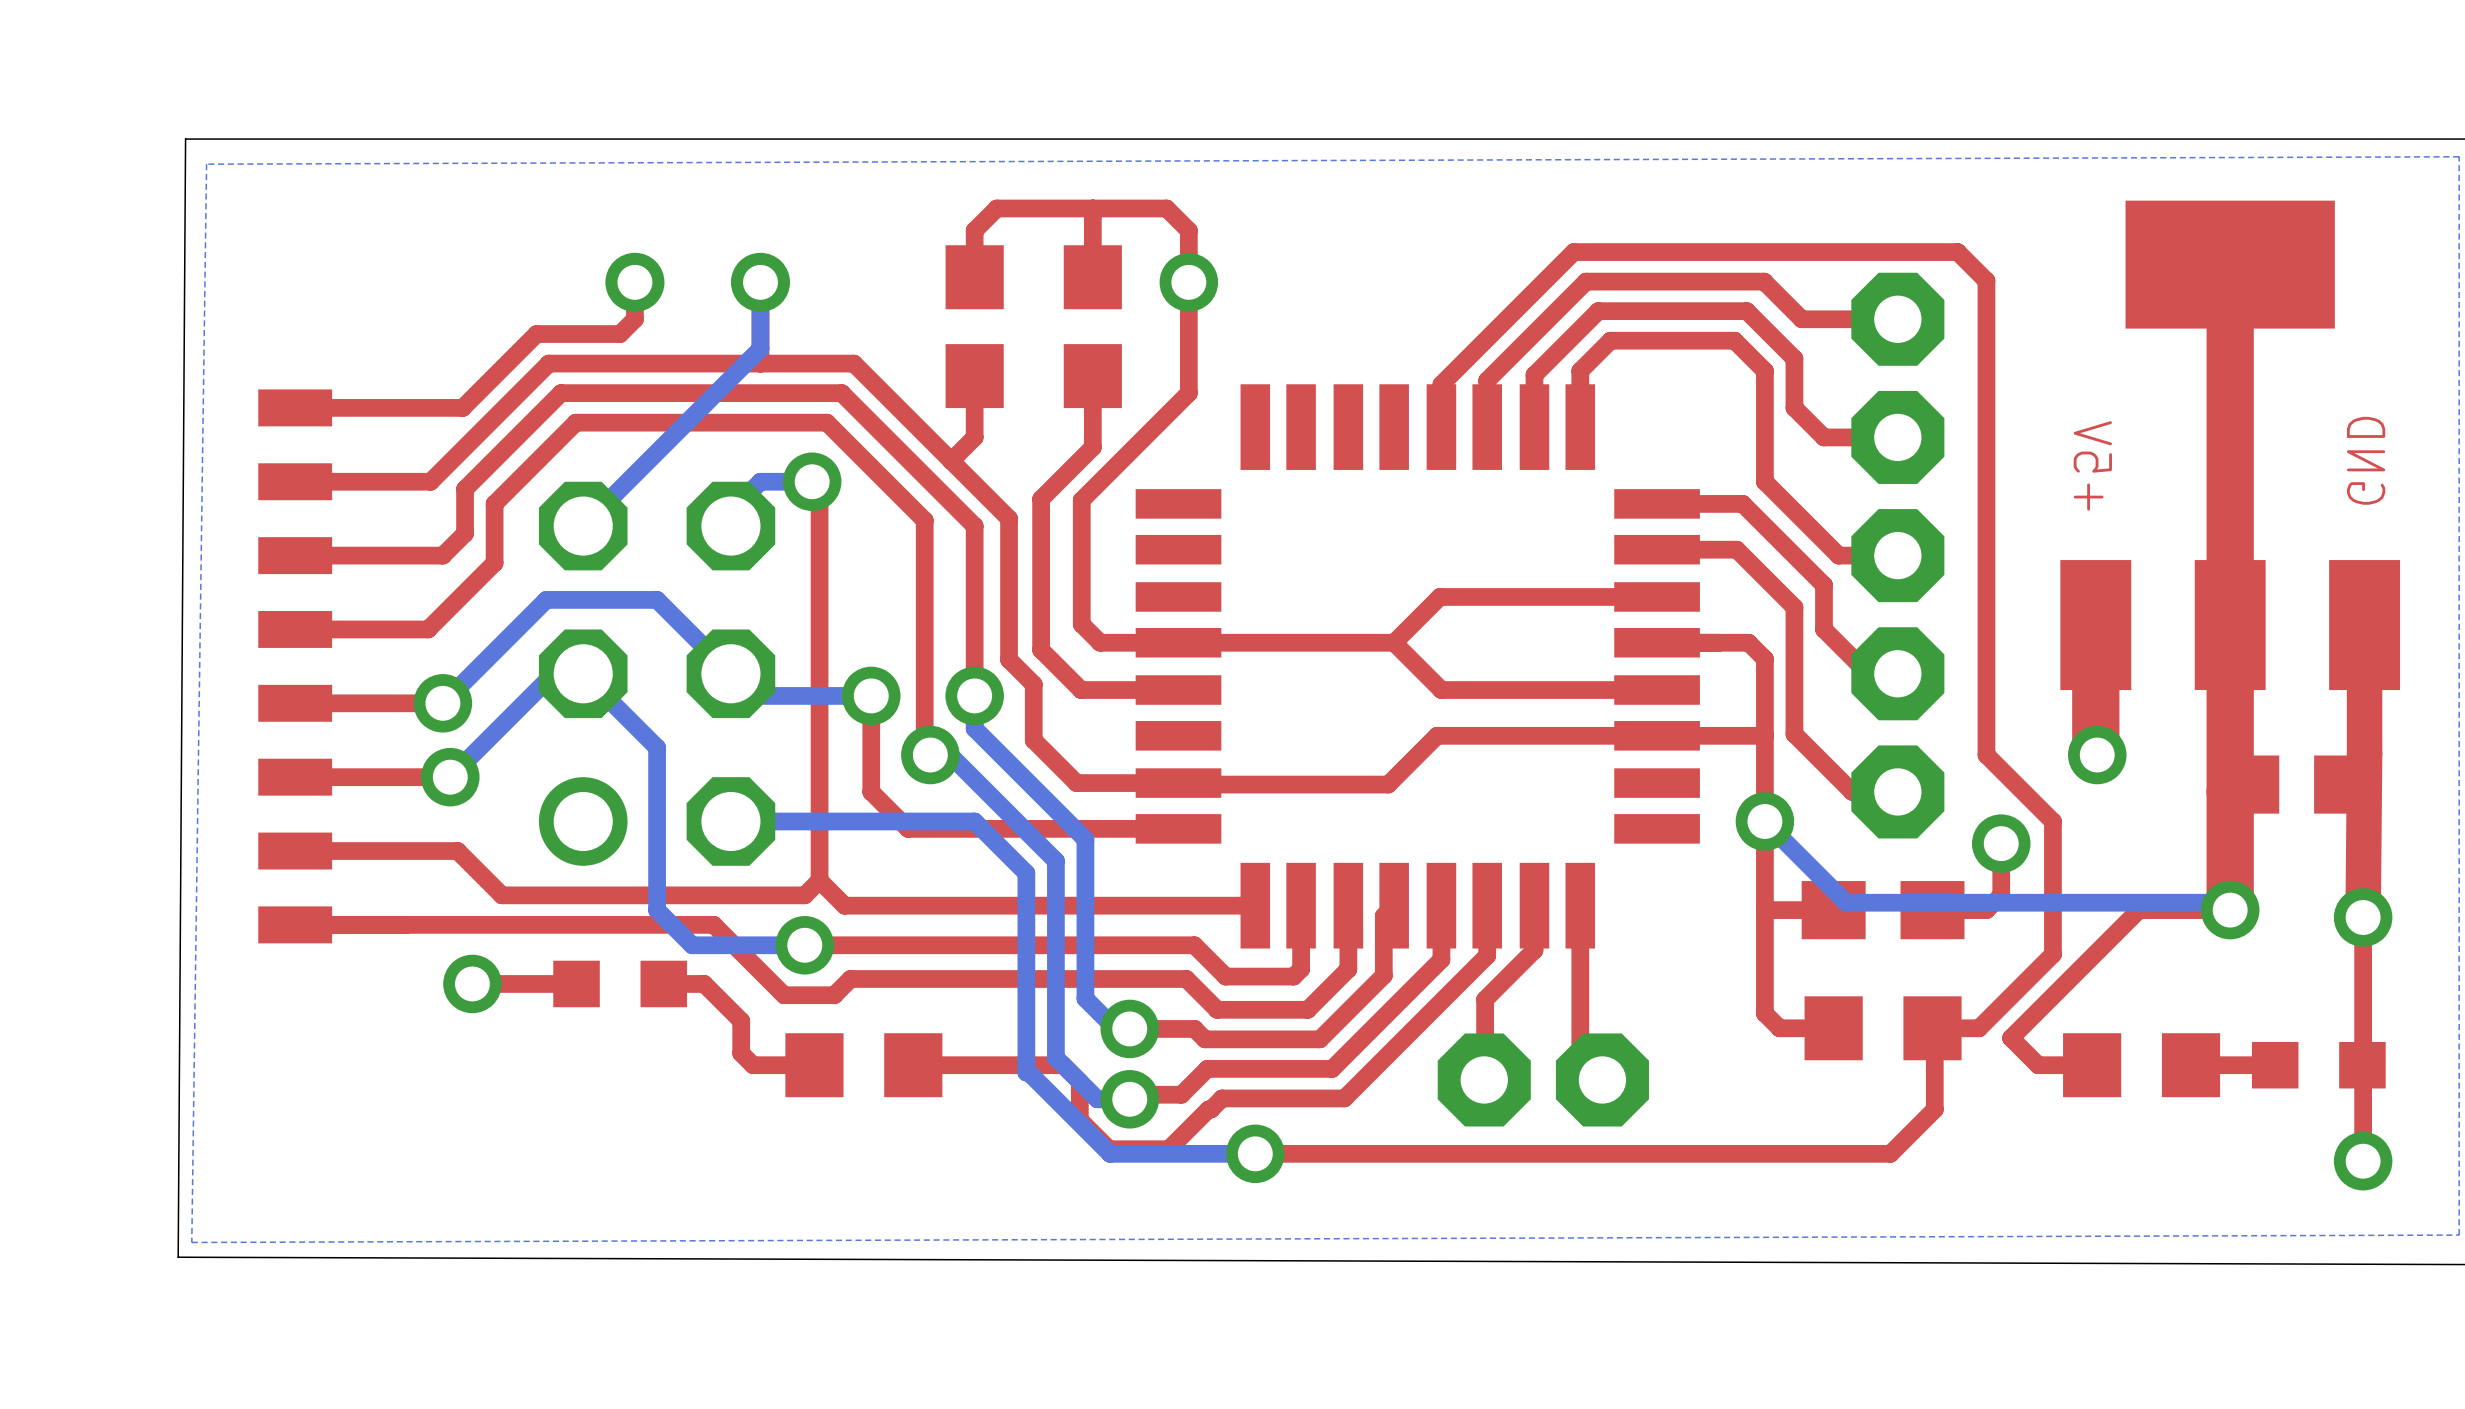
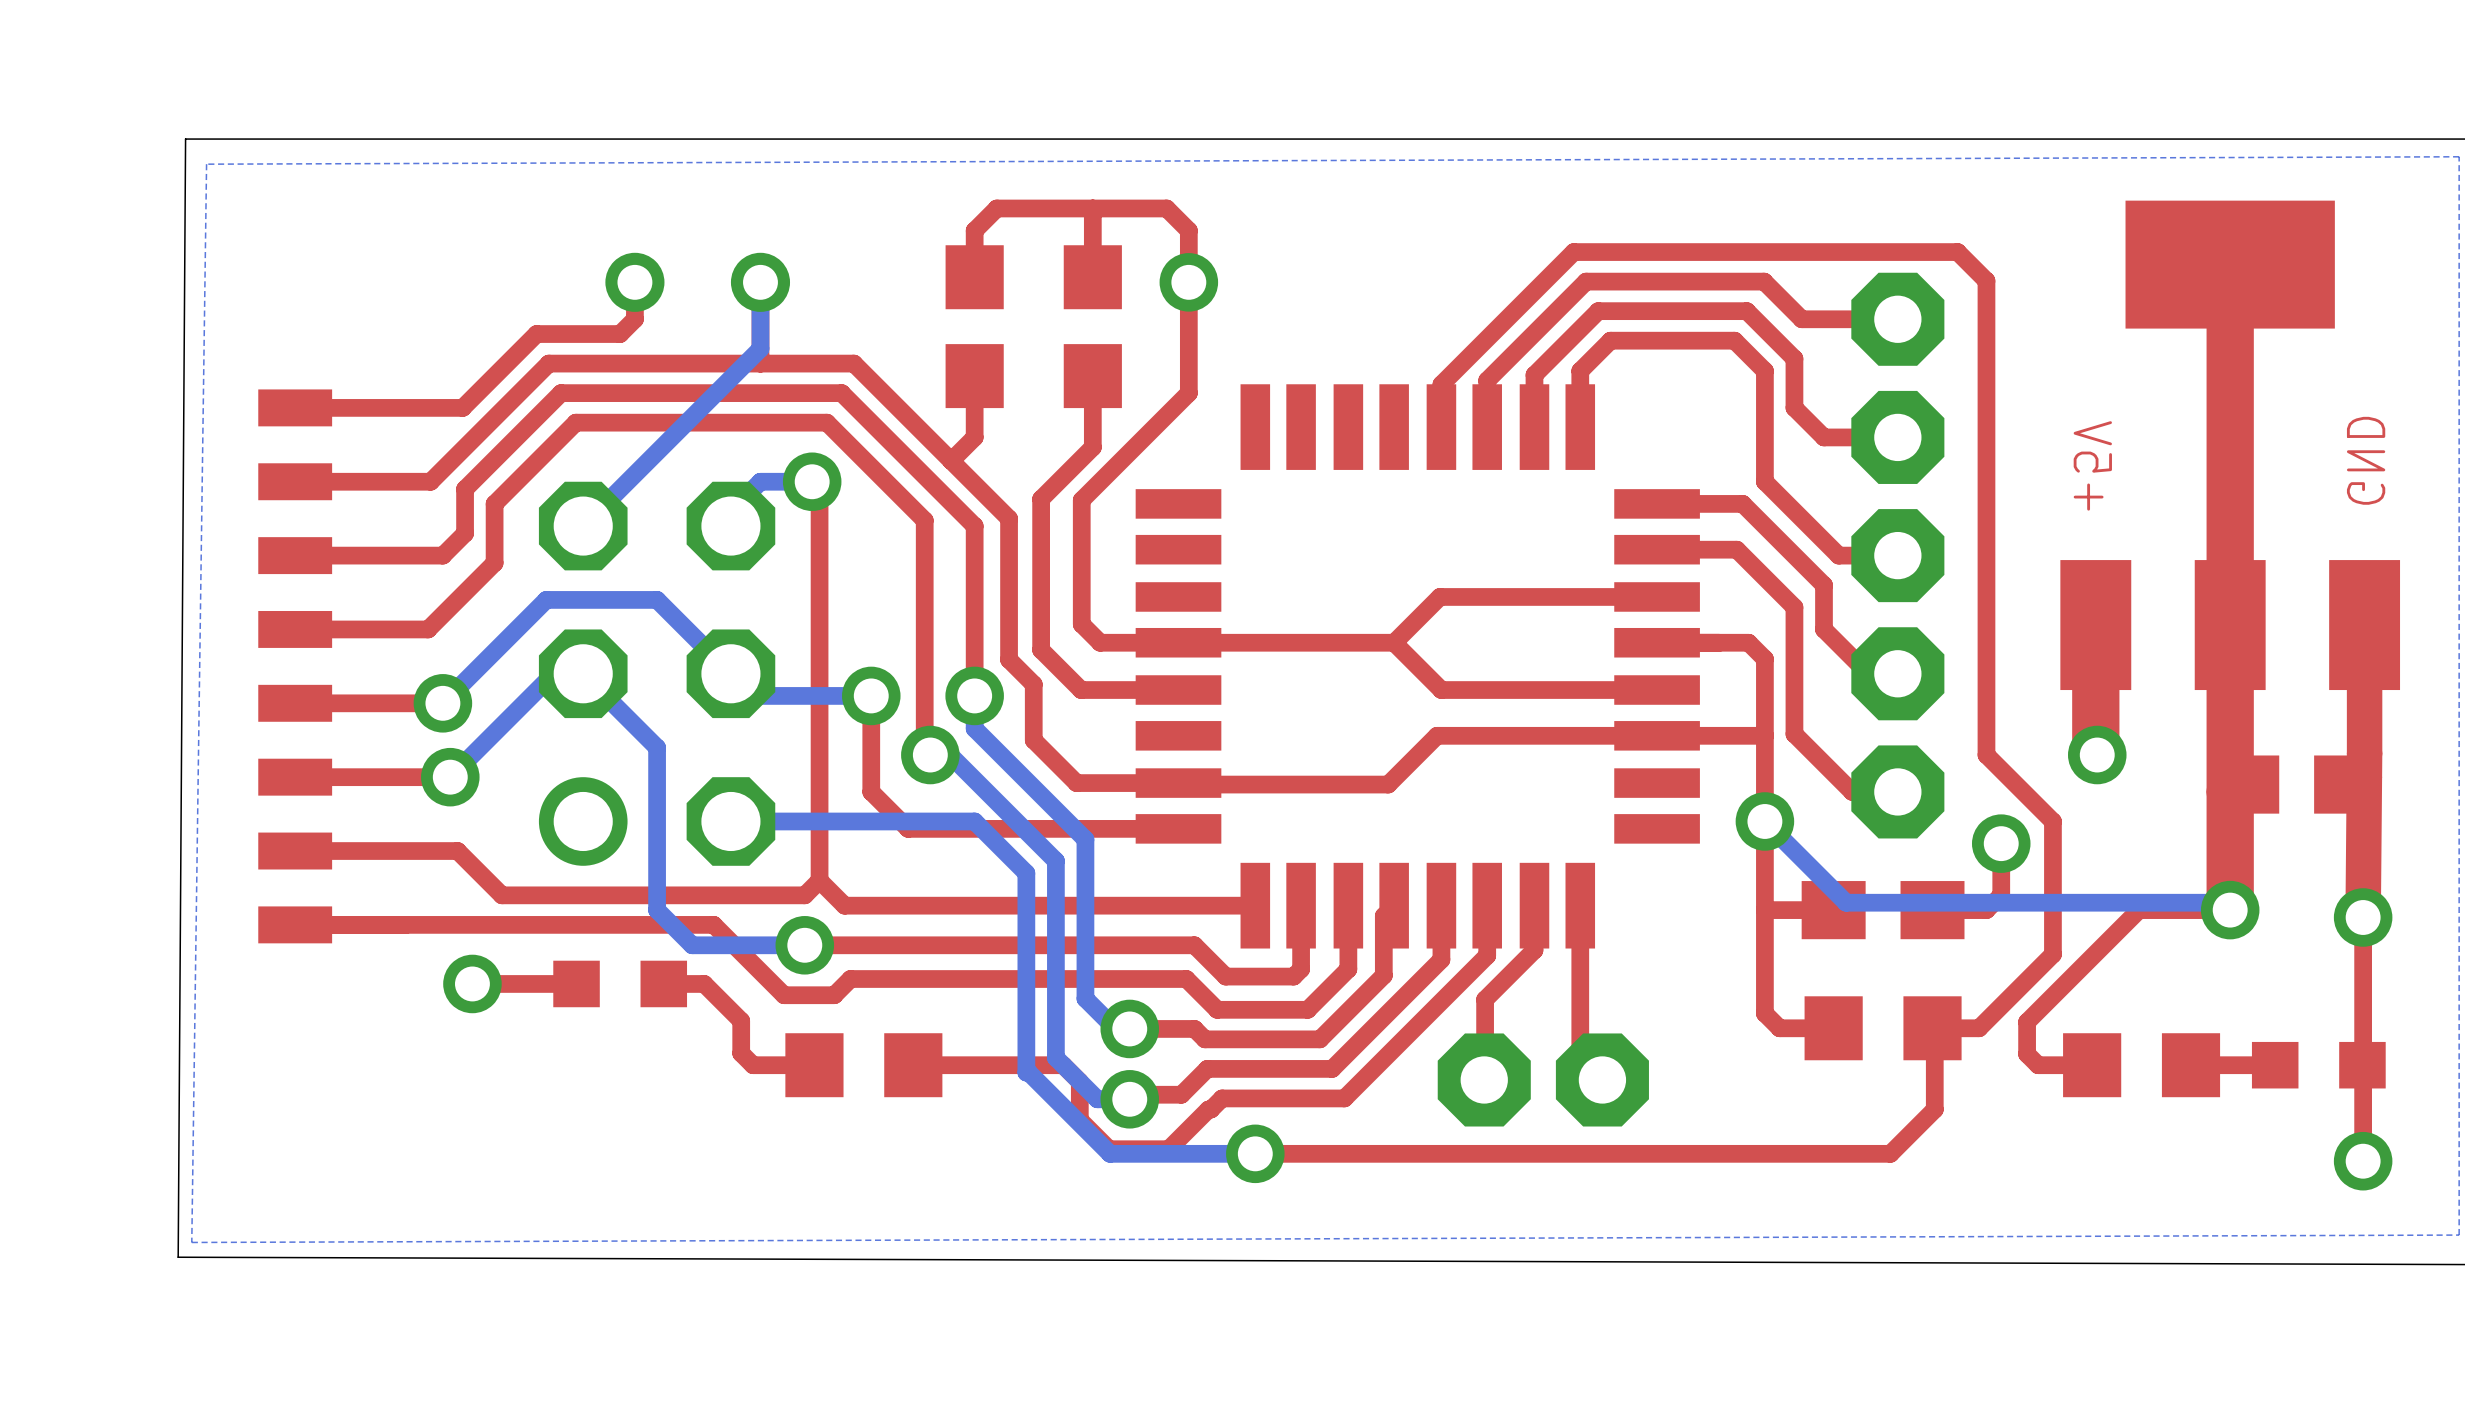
top track: (2027, 1022) (2011, 1038) (2027, 1054) -> (2027, 1022) (2027, 1054)

